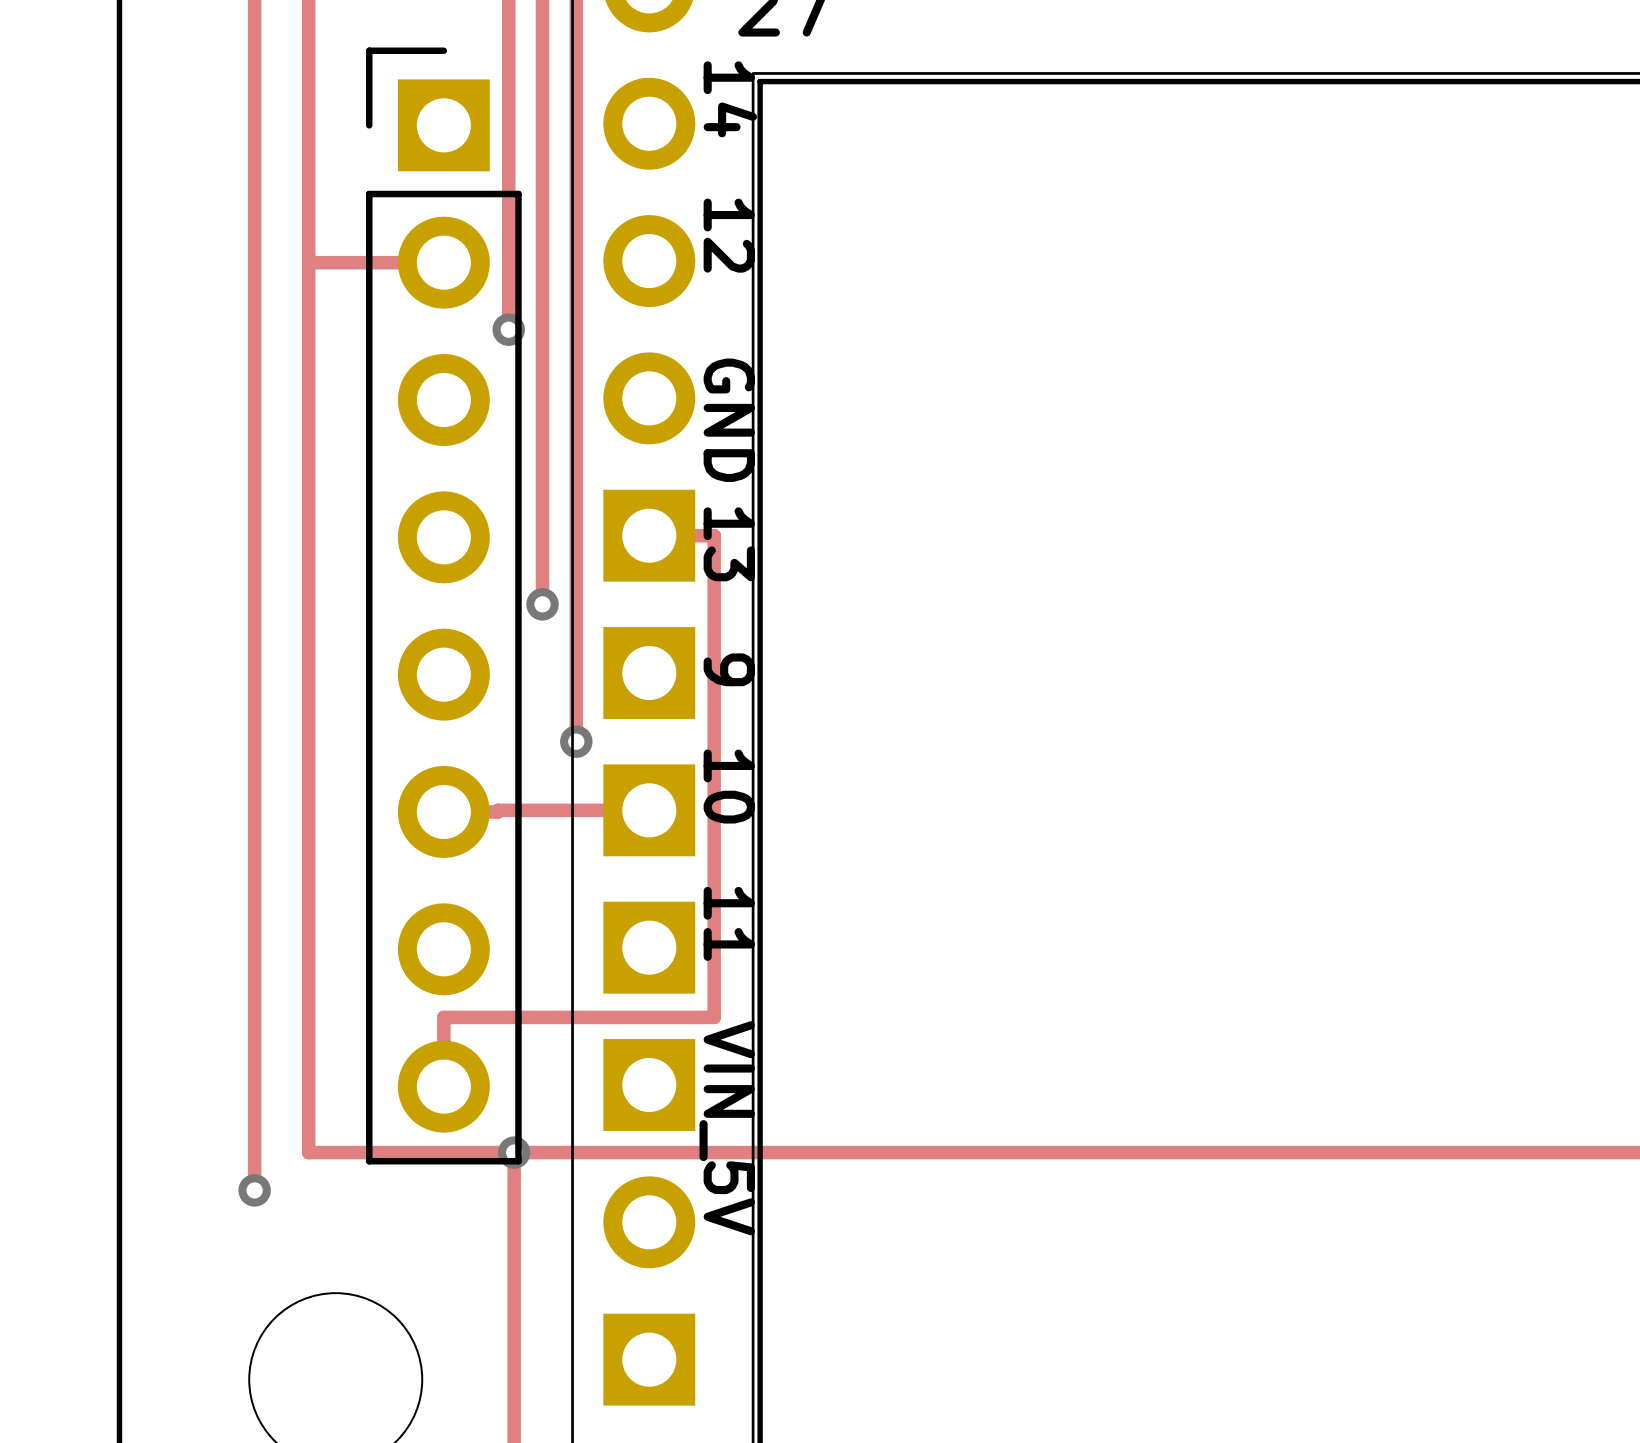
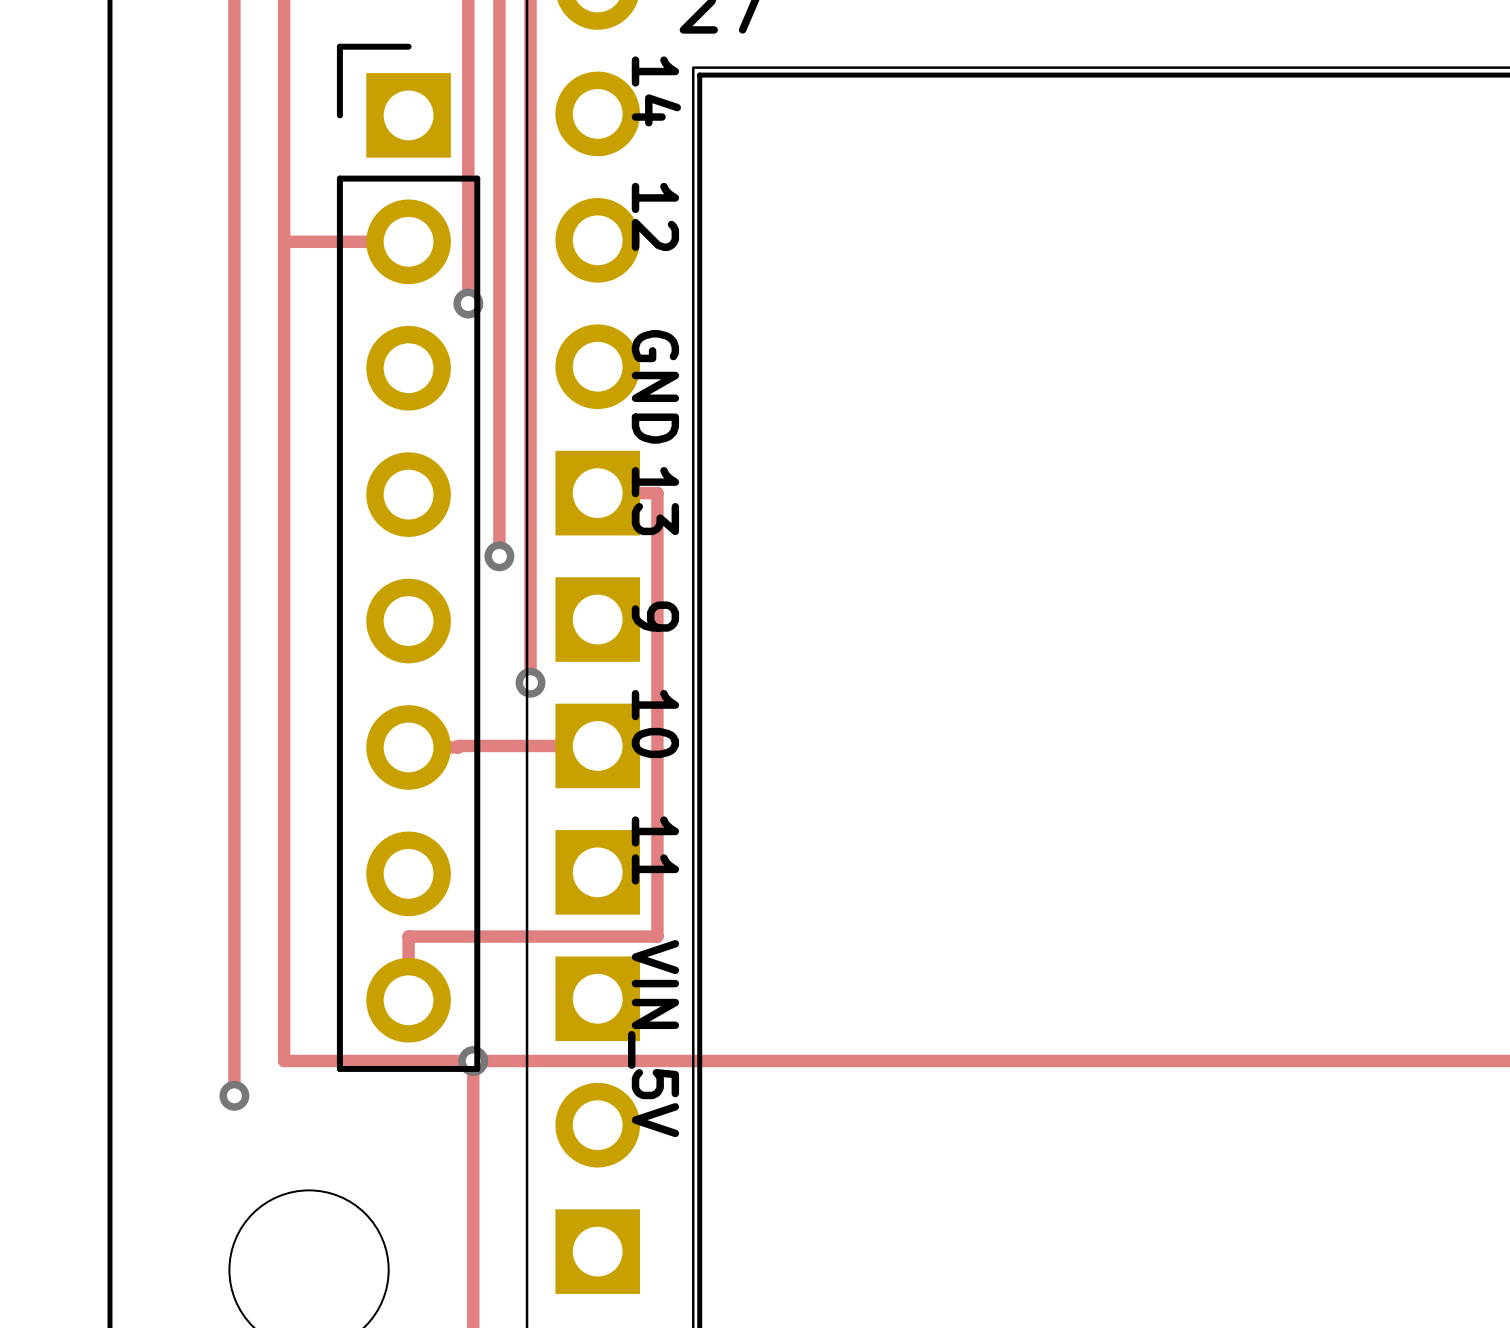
part text position: 14 (730, 99) -> 14 (656, 91)
part text position: 12 (729, 235) -> 12 (655, 216)
part text position: GND (729, 420) -> GND (655, 386)
part text position: 13 (729, 544) -> 13 (655, 501)
part text position: 9 (729, 669) -> 9 (655, 616)
part text position: 10 (729, 786) -> 10 (655, 724)
part text position: 11 (729, 923) -> 11 (655, 850)
part text position: VIN_5V (727, 1128) -> VIN_5V (653, 1038)

